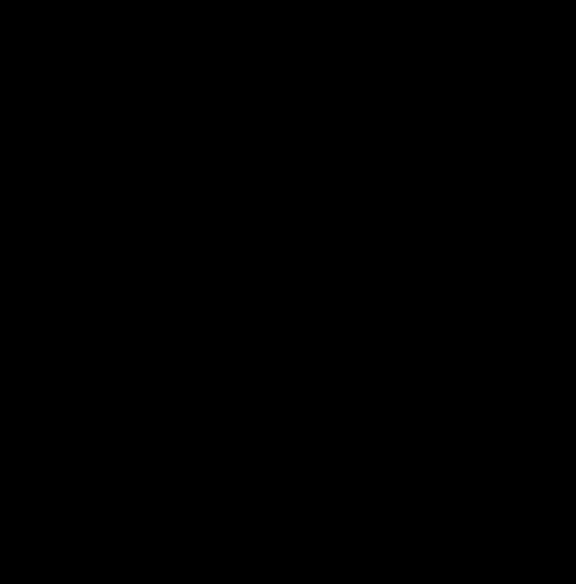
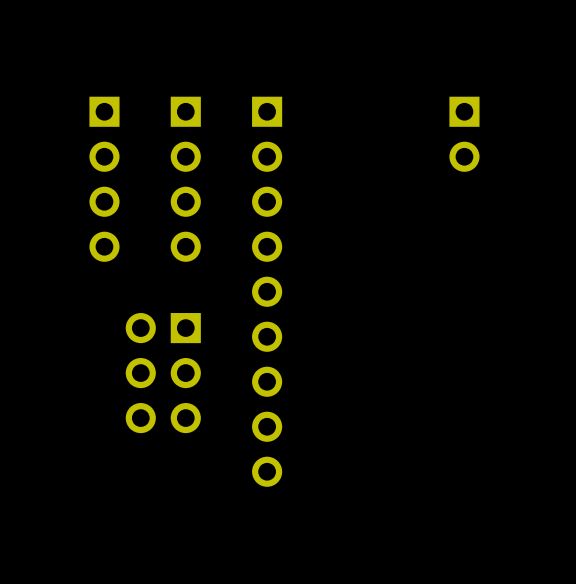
part: none -> (464, 134)
part: none -> (104, 179)
part: none -> (185, 179)
part: none -> (267, 291)
part: none -> (163, 373)

